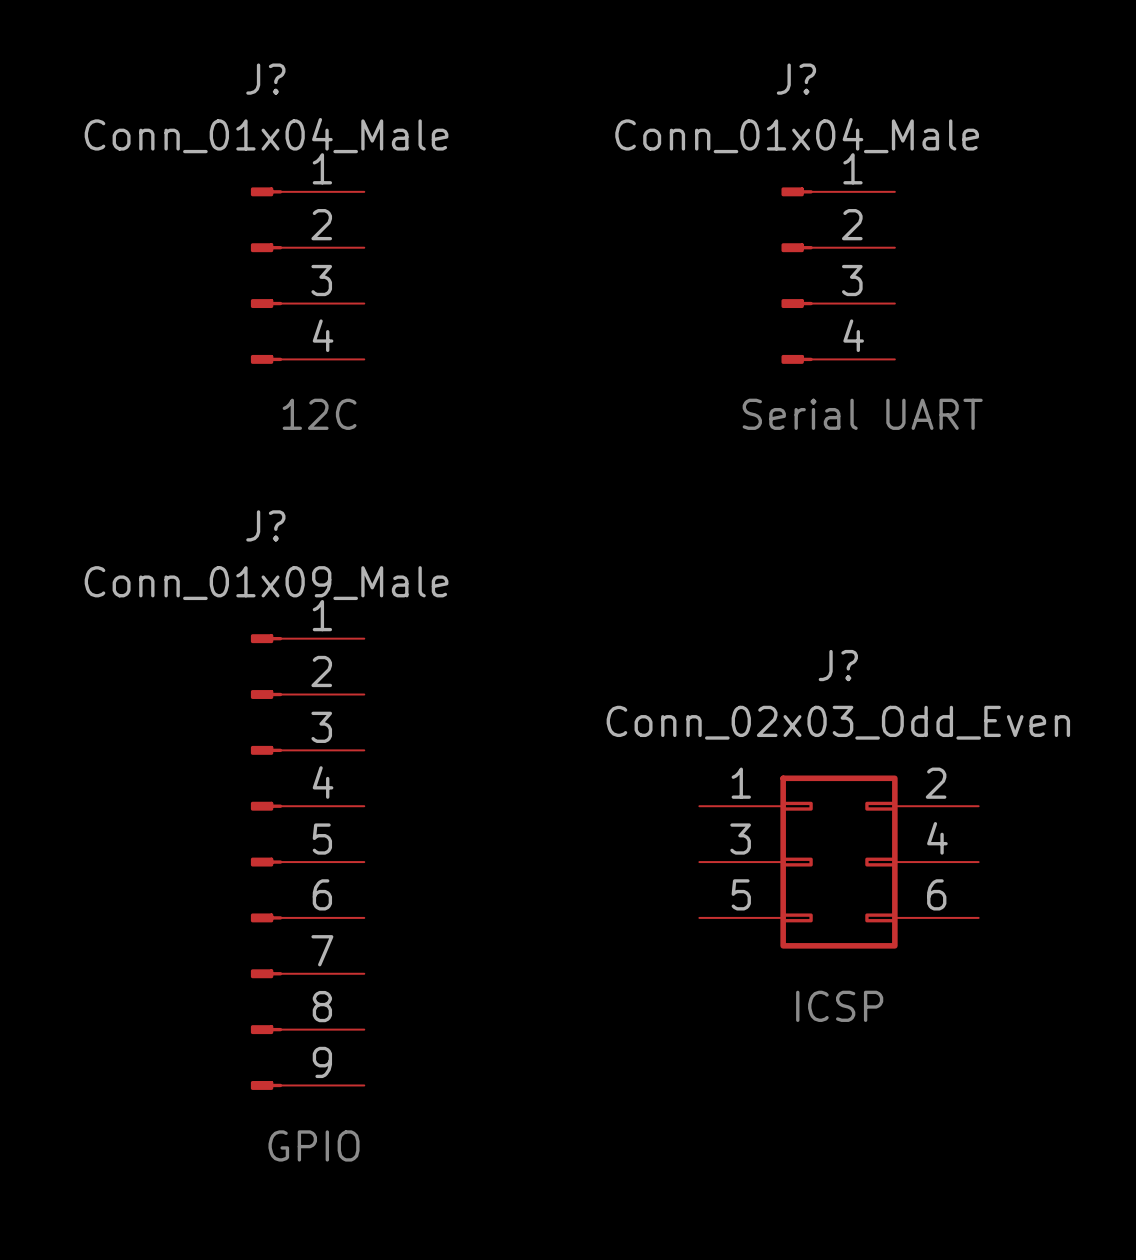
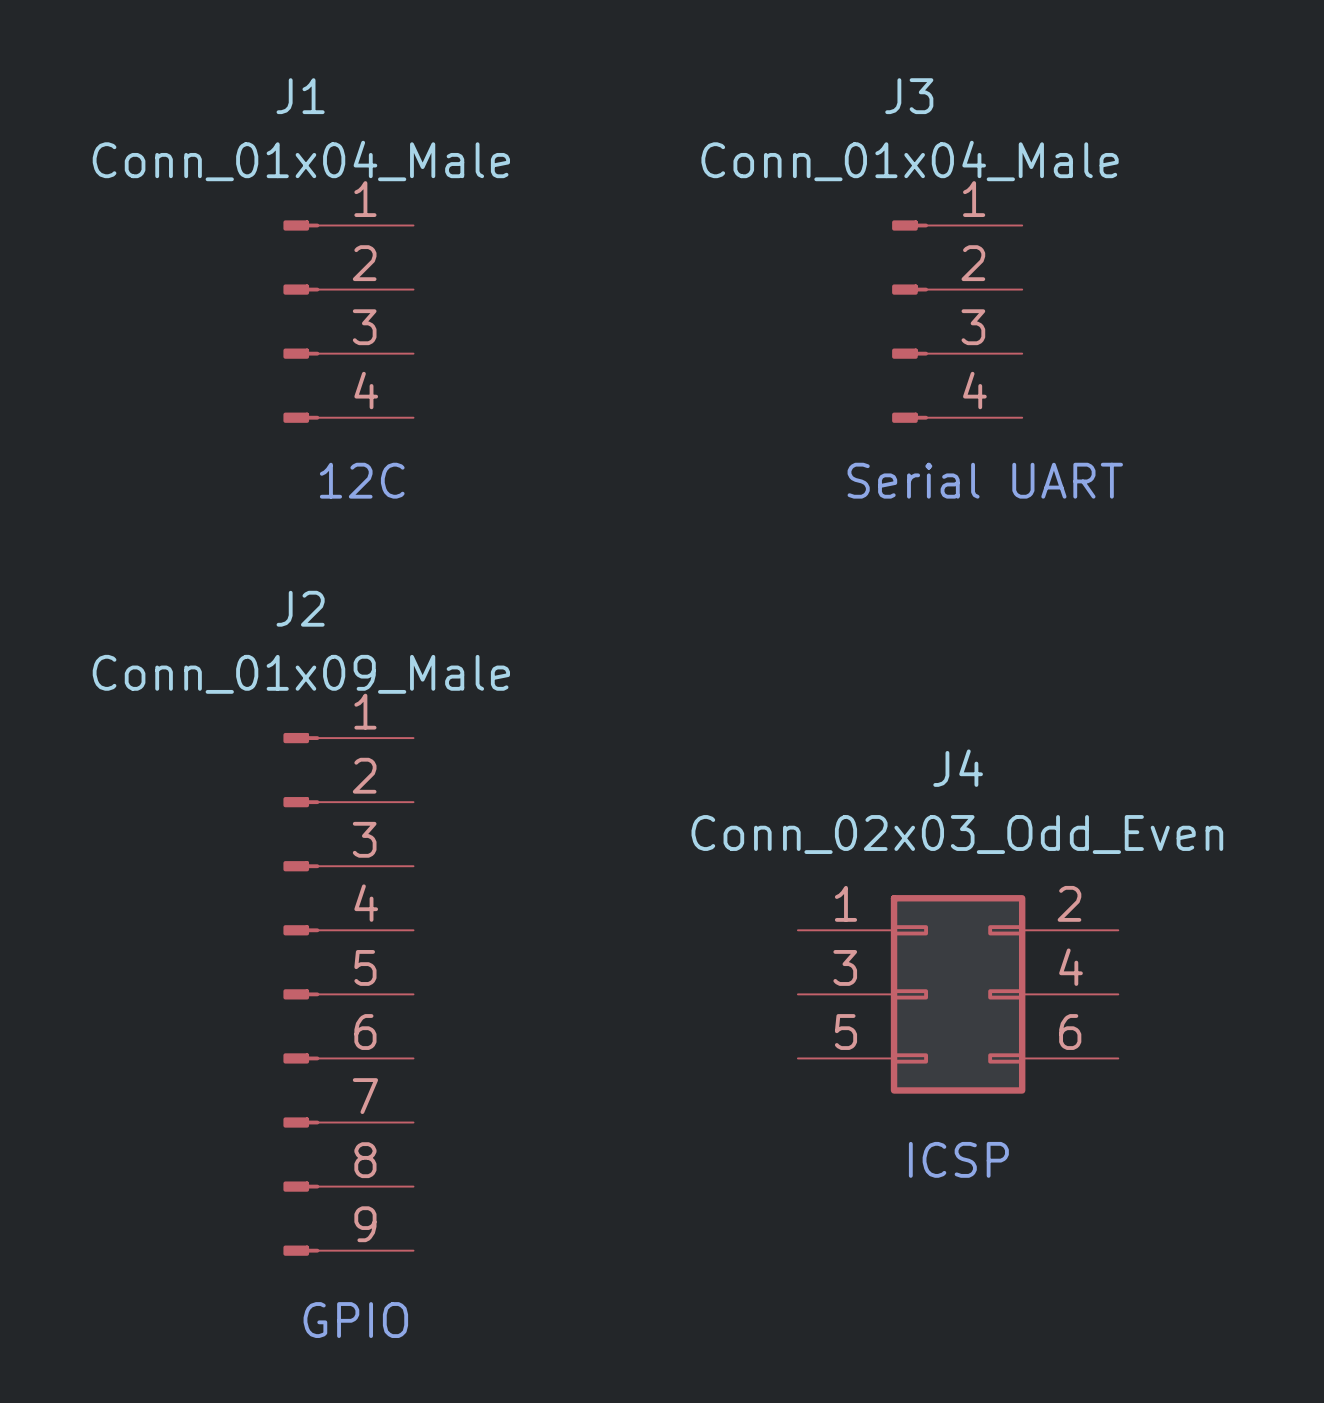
J? name: J? (265, 79) -> J1 (300, 96)
J? name: J? (796, 79) -> J3 (909, 96)
J? name: J? (265, 525) -> J2 (300, 608)
J? name: J? (838, 665) -> J4 (958, 768)

